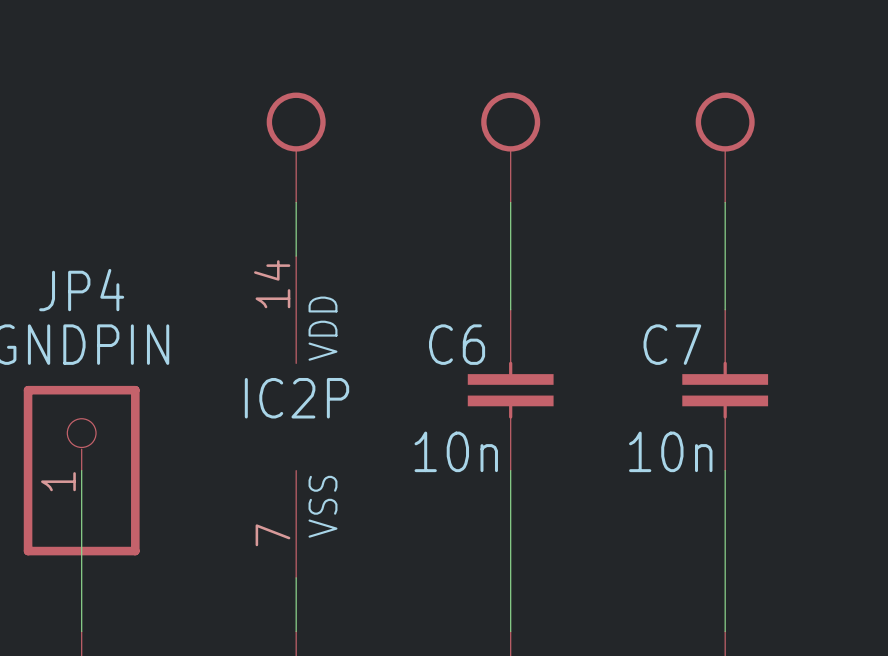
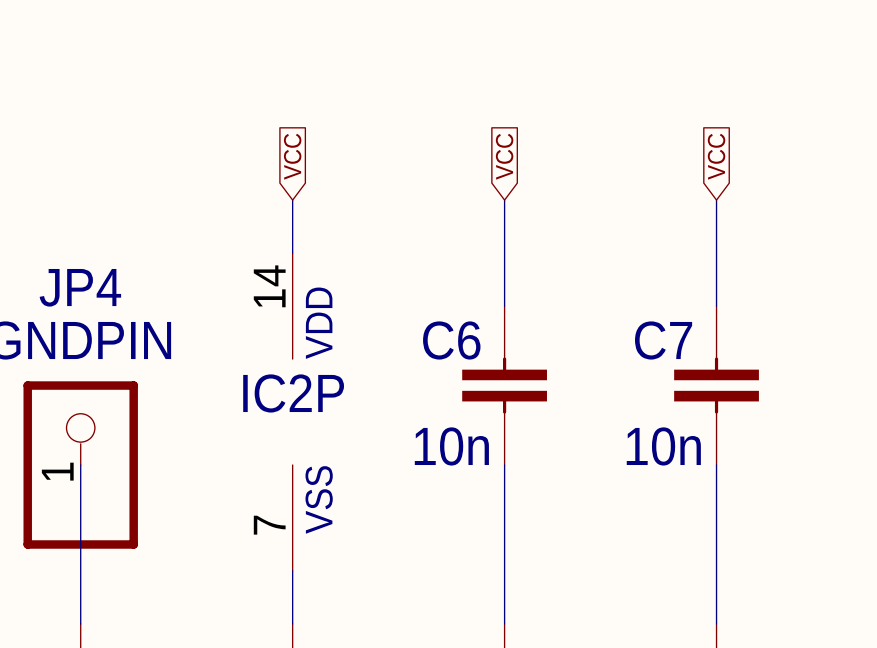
power symbol: (296, 147) -> none
power symbol: (510, 147) -> none
power symbol: (725, 147) -> none
global label: none -> VCC (292, 156)
global label: none -> VCC (504, 156)
global label: none -> VCC (716, 156)

